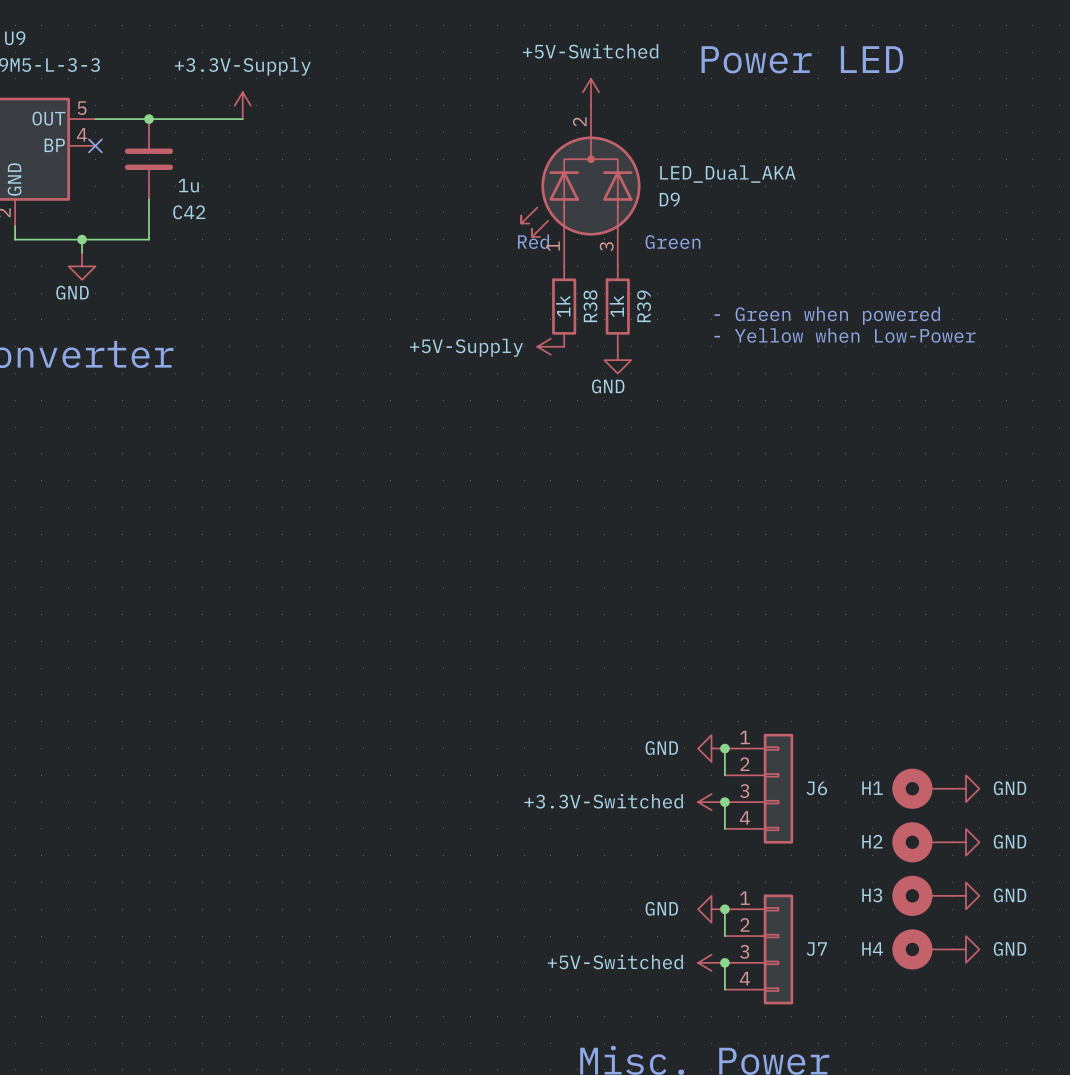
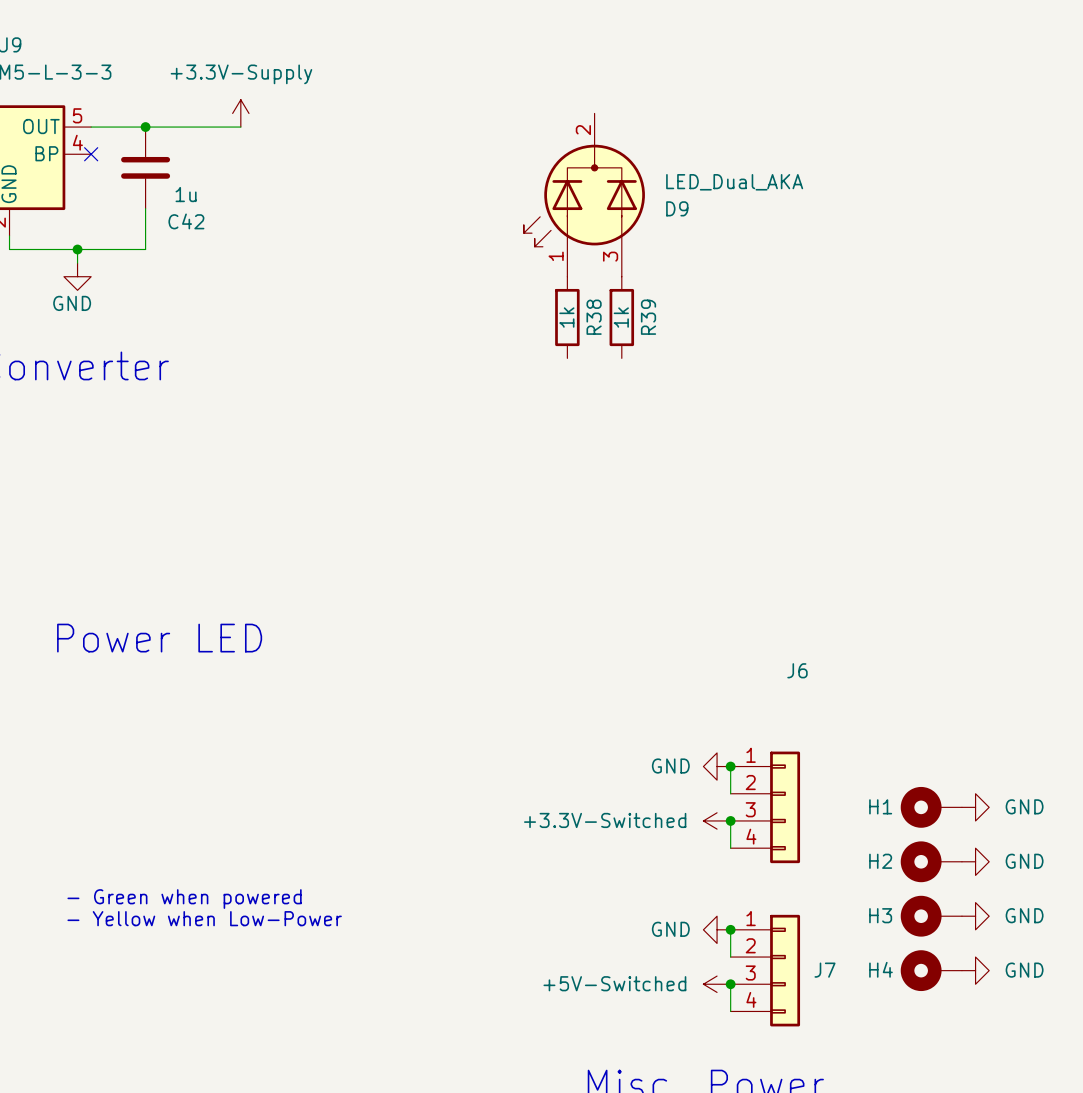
text: Power LED (802, 59) -> none
power symbol: +5V-Switched (590, 92) -> none
text: Red (533, 241) -> none
text: Green (672, 242) -> none
text: - Green when powered (827, 315) -> none
text: - Yellow when Low-Power (845, 335) -> none
power symbol: +5V-Supply (550, 346) -> none
power symbol: GND (617, 360) -> none
text: none -> Power LED (159, 638)
J6 name position: J6 (816, 788) -> J6 (797, 670)
text: none -> - Green when powered (184, 899)
text: none -> - Yellow when Low-Power (204, 918)

